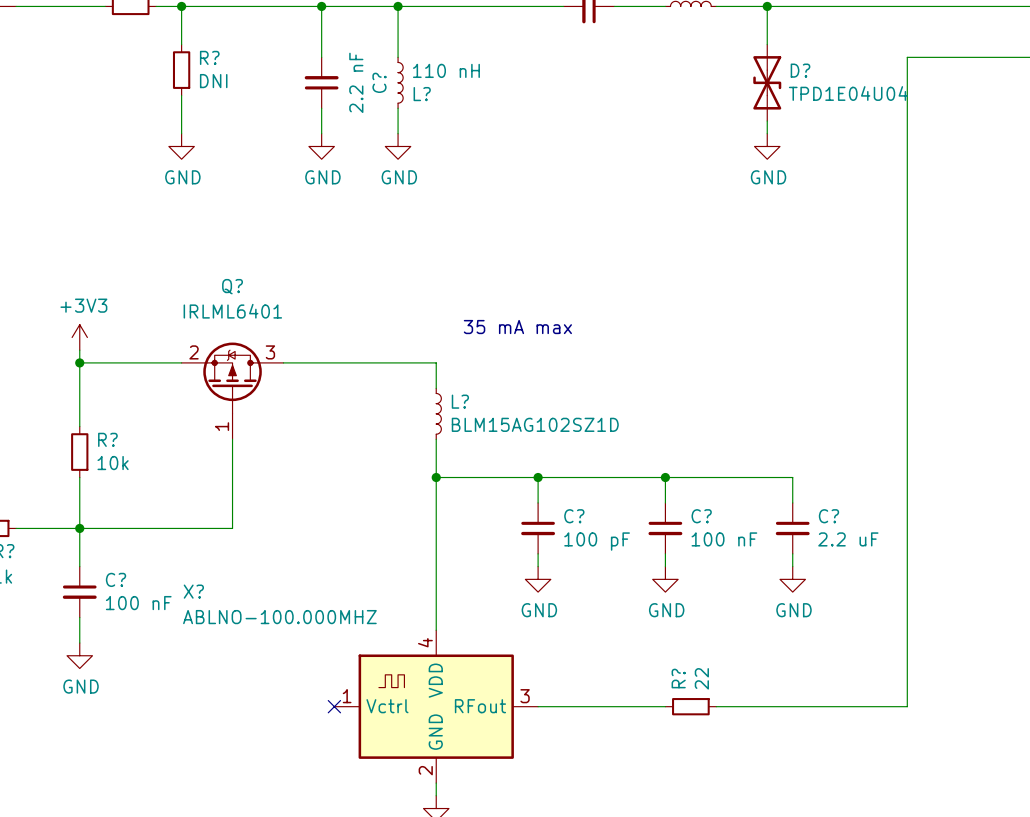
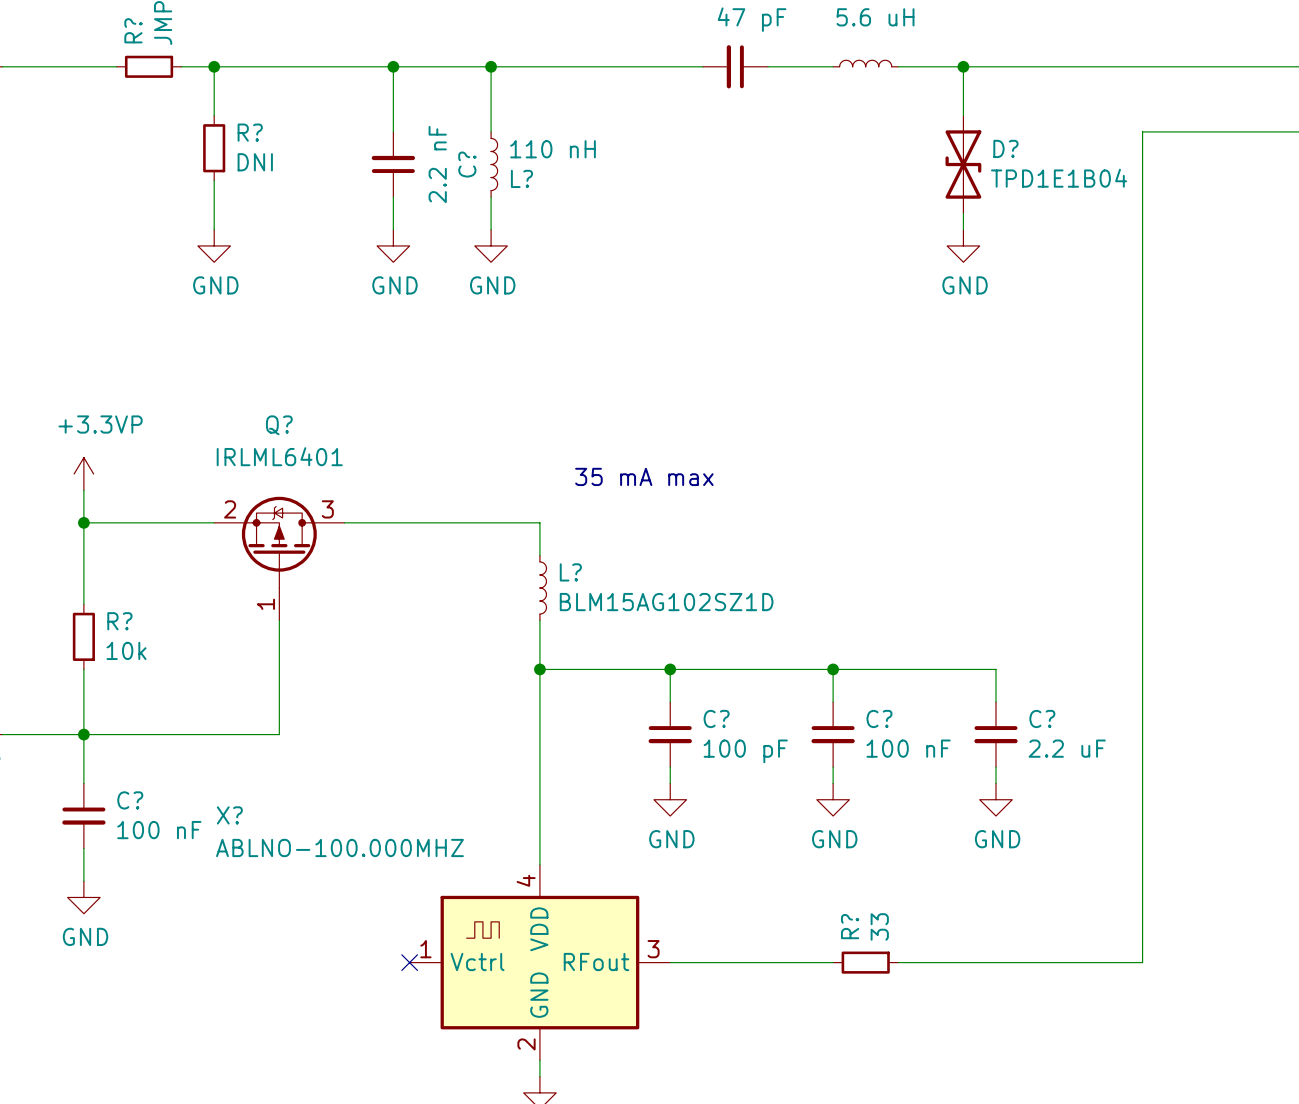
D? value: TPD1E04U04 (848, 93) -> TPD1E1B04 (1059, 178)
power symbol: none -> +3.3VP (83, 473)
power symbol: +3V3 (79, 337) -> none
R? value: 22 (701, 678) -> 33 (879, 926)

